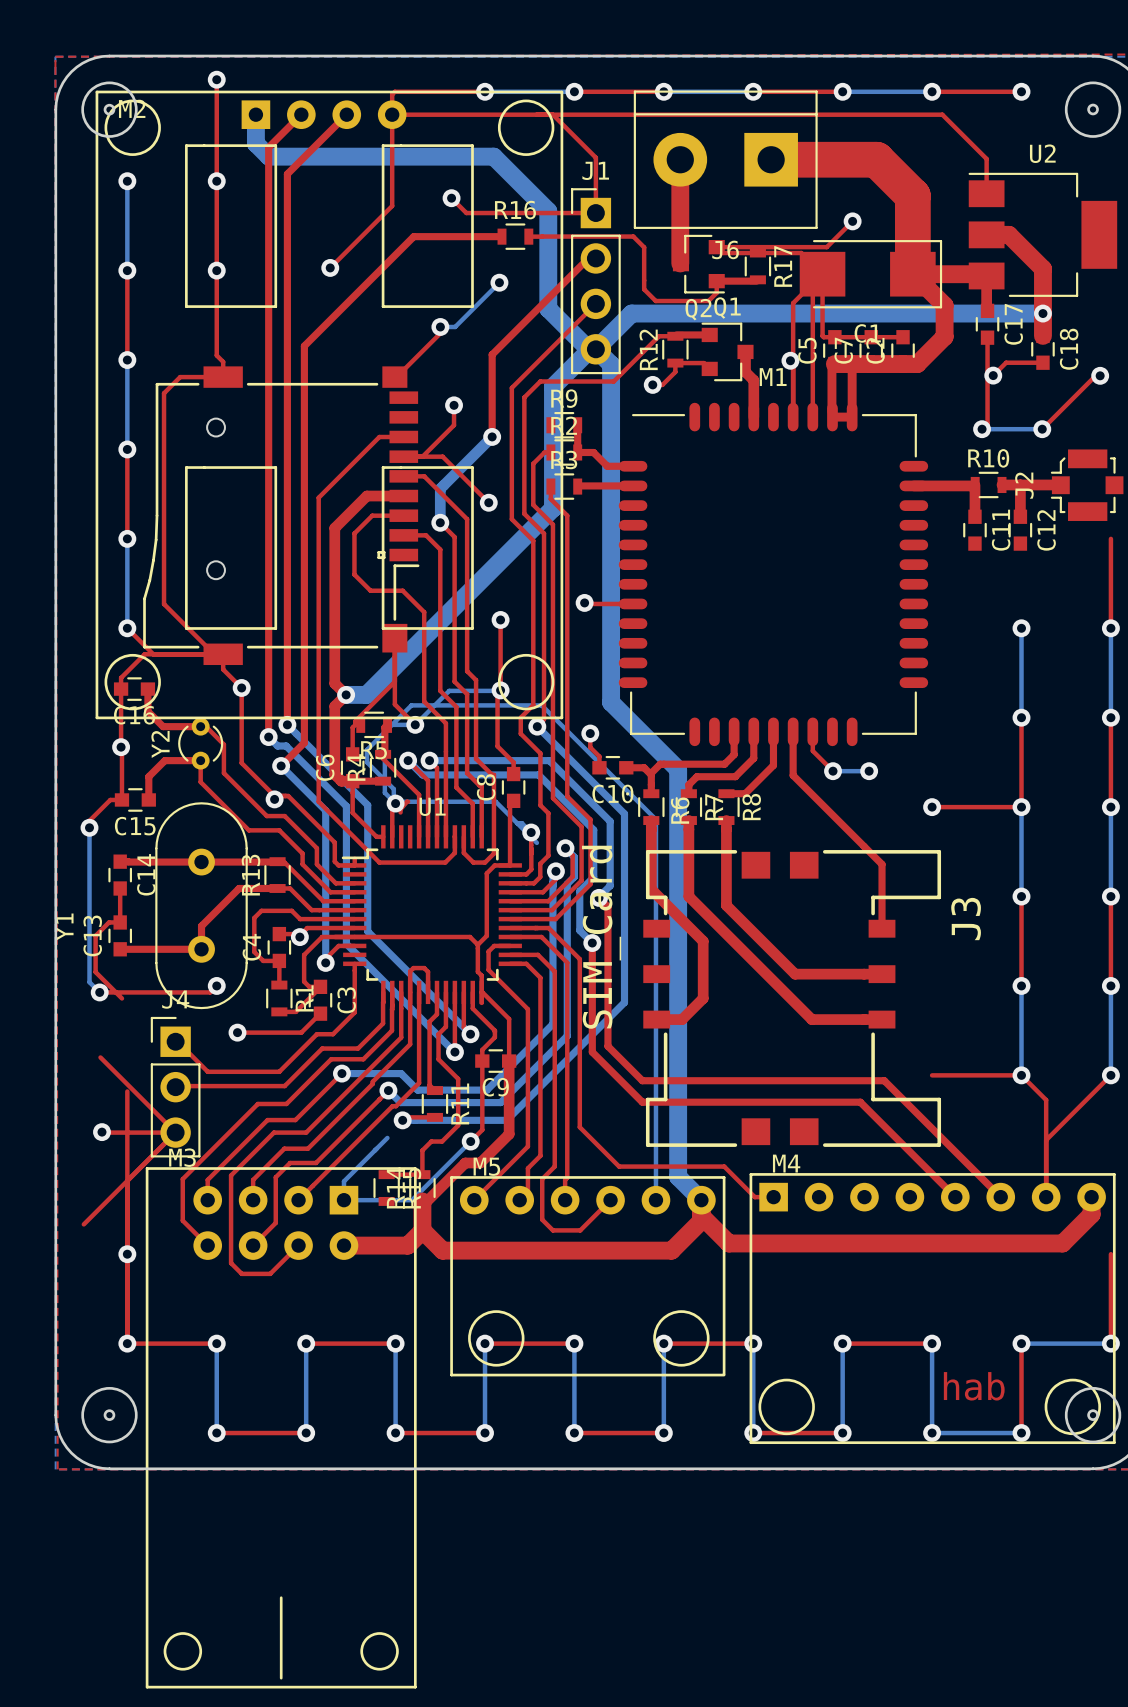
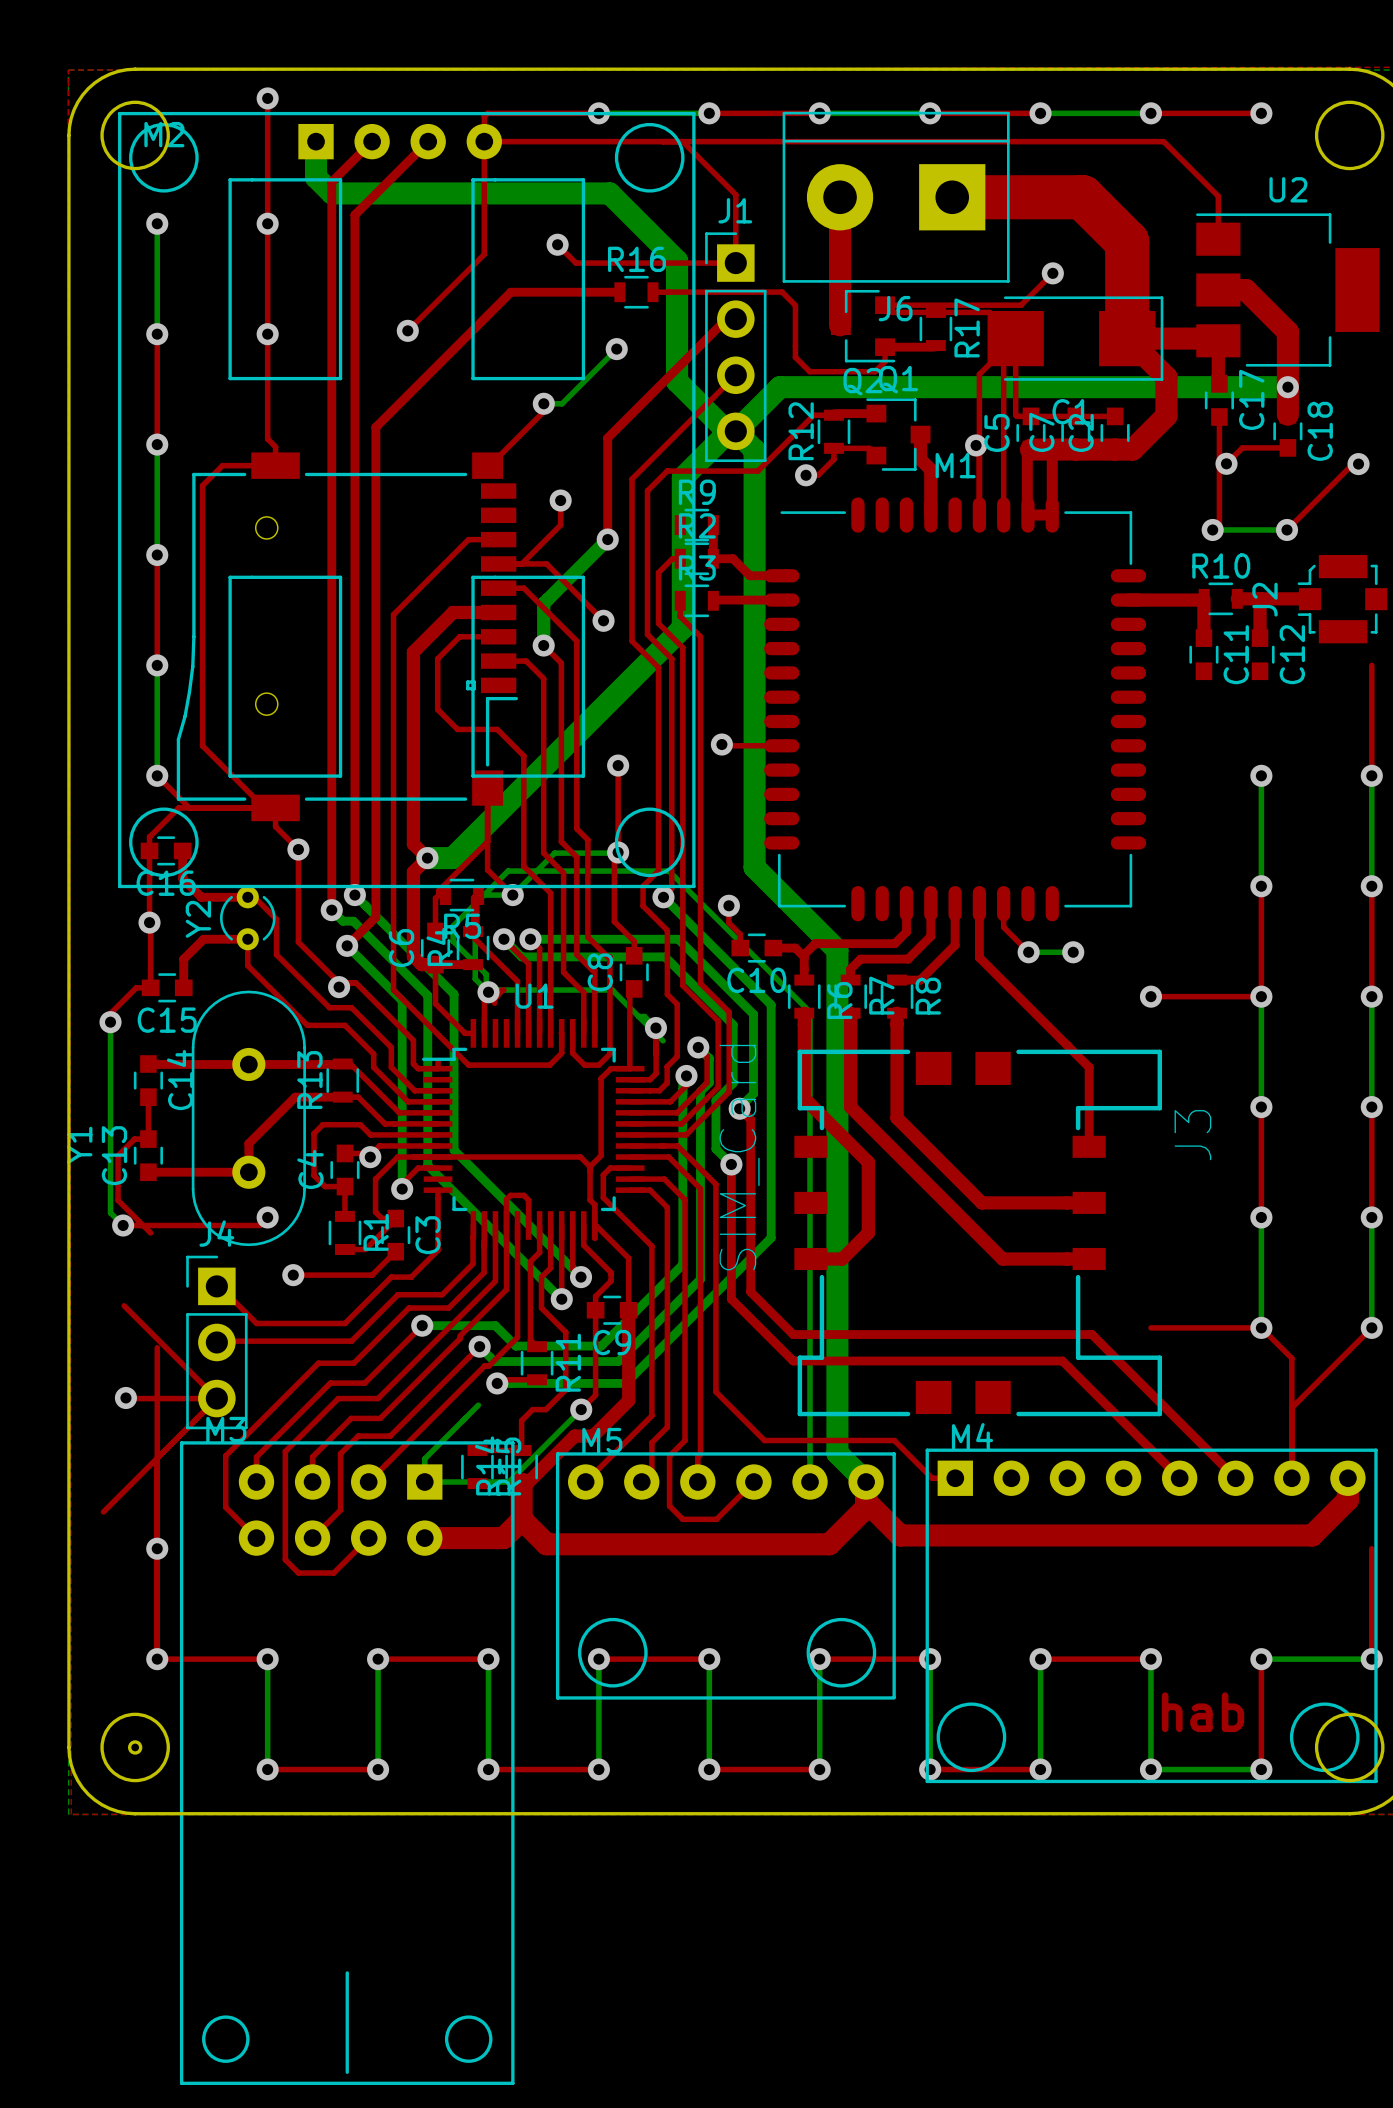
round board edge: [103, 103, 116, 116] -> none
round board edge: [1087, 103, 1099, 116] -> none
round board edge: [1087, 1409, 1099, 1421] -> none

